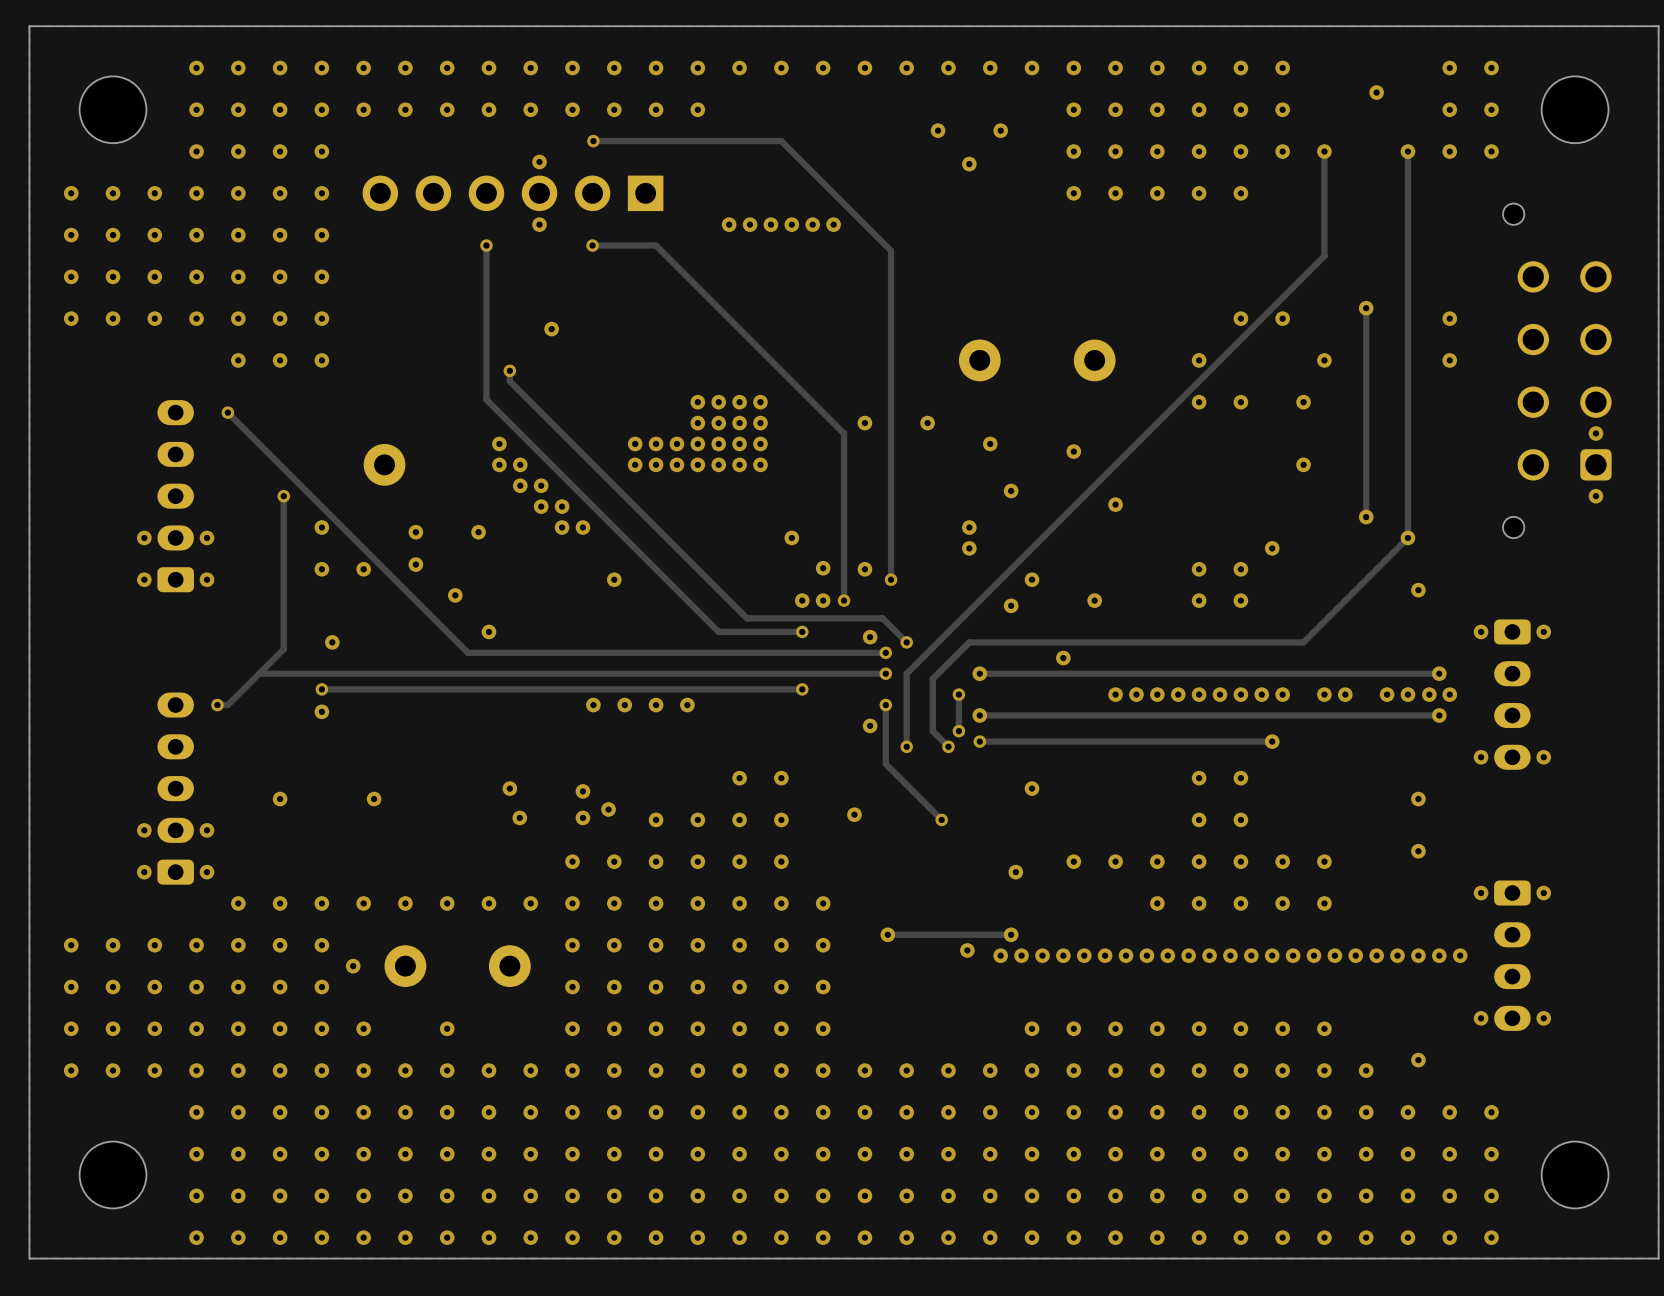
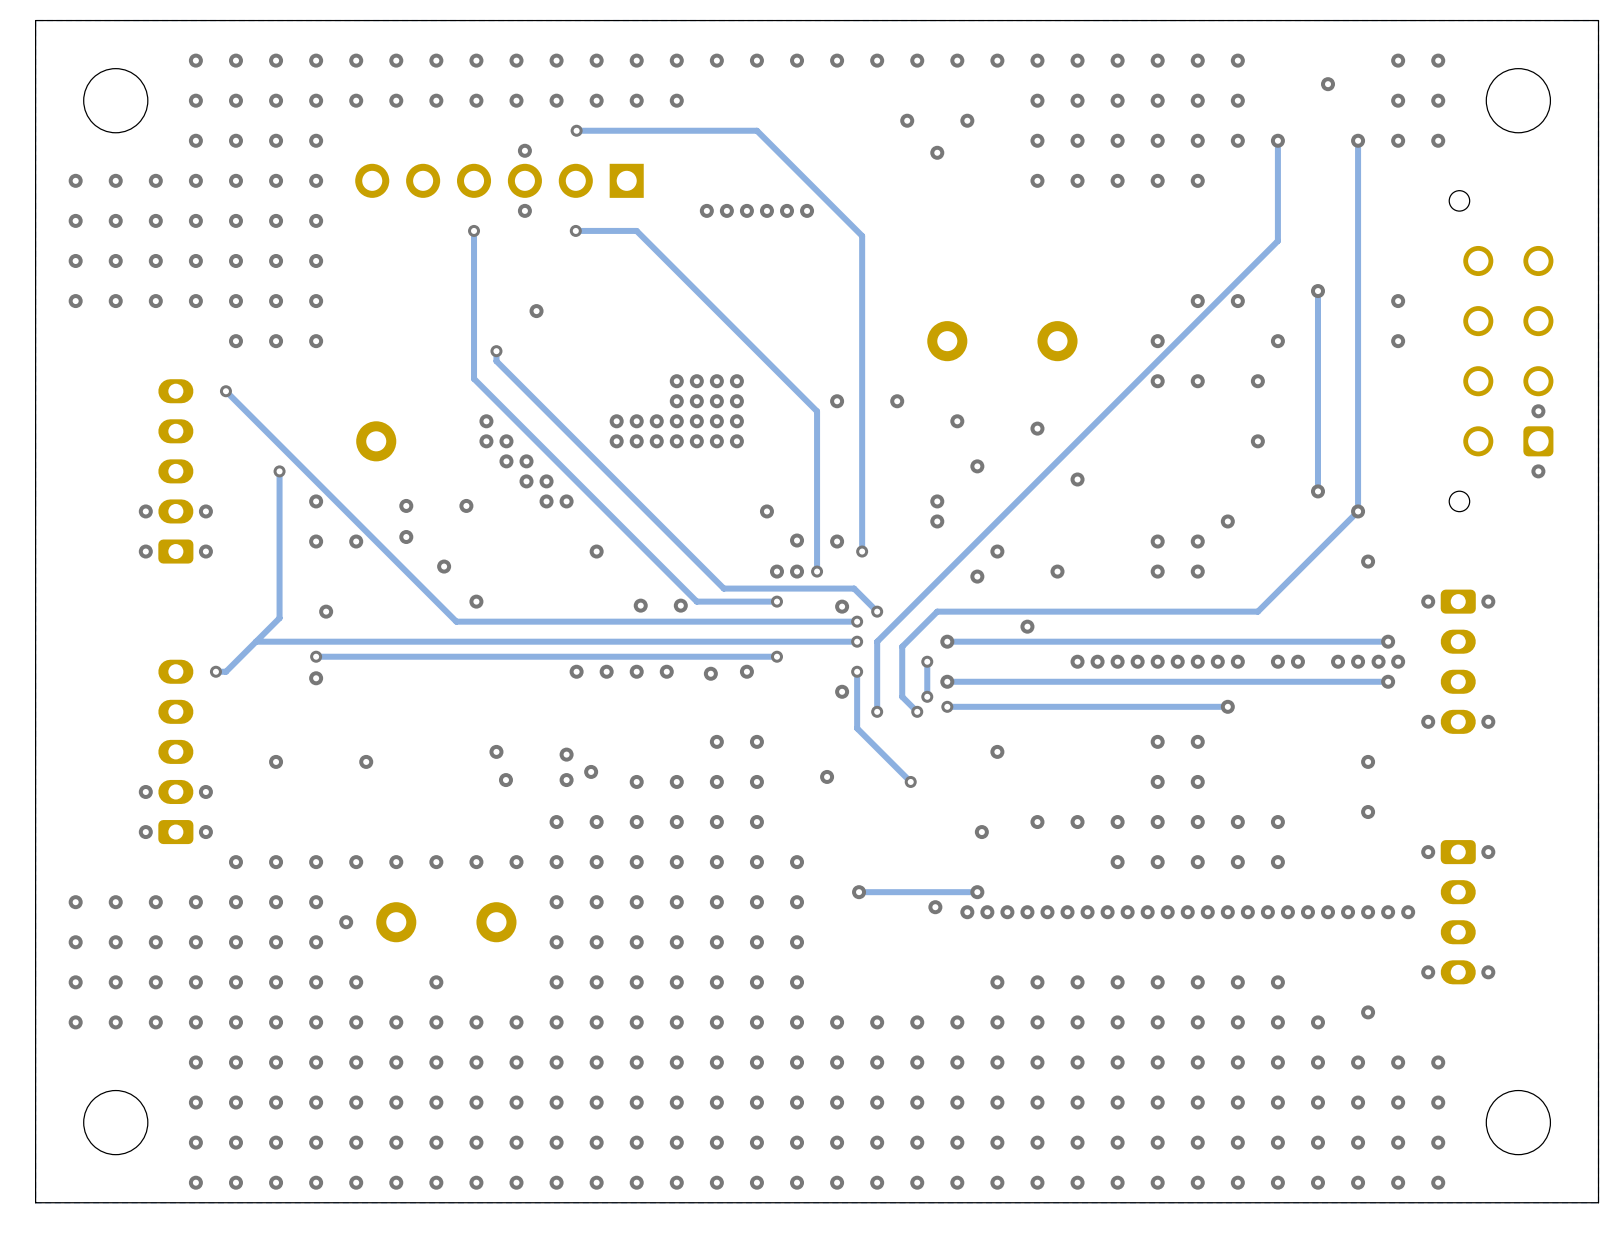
via: none -> (640, 605)
via: none -> (680, 605)
via: none -> (746, 671)
via: none -> (710, 673)

